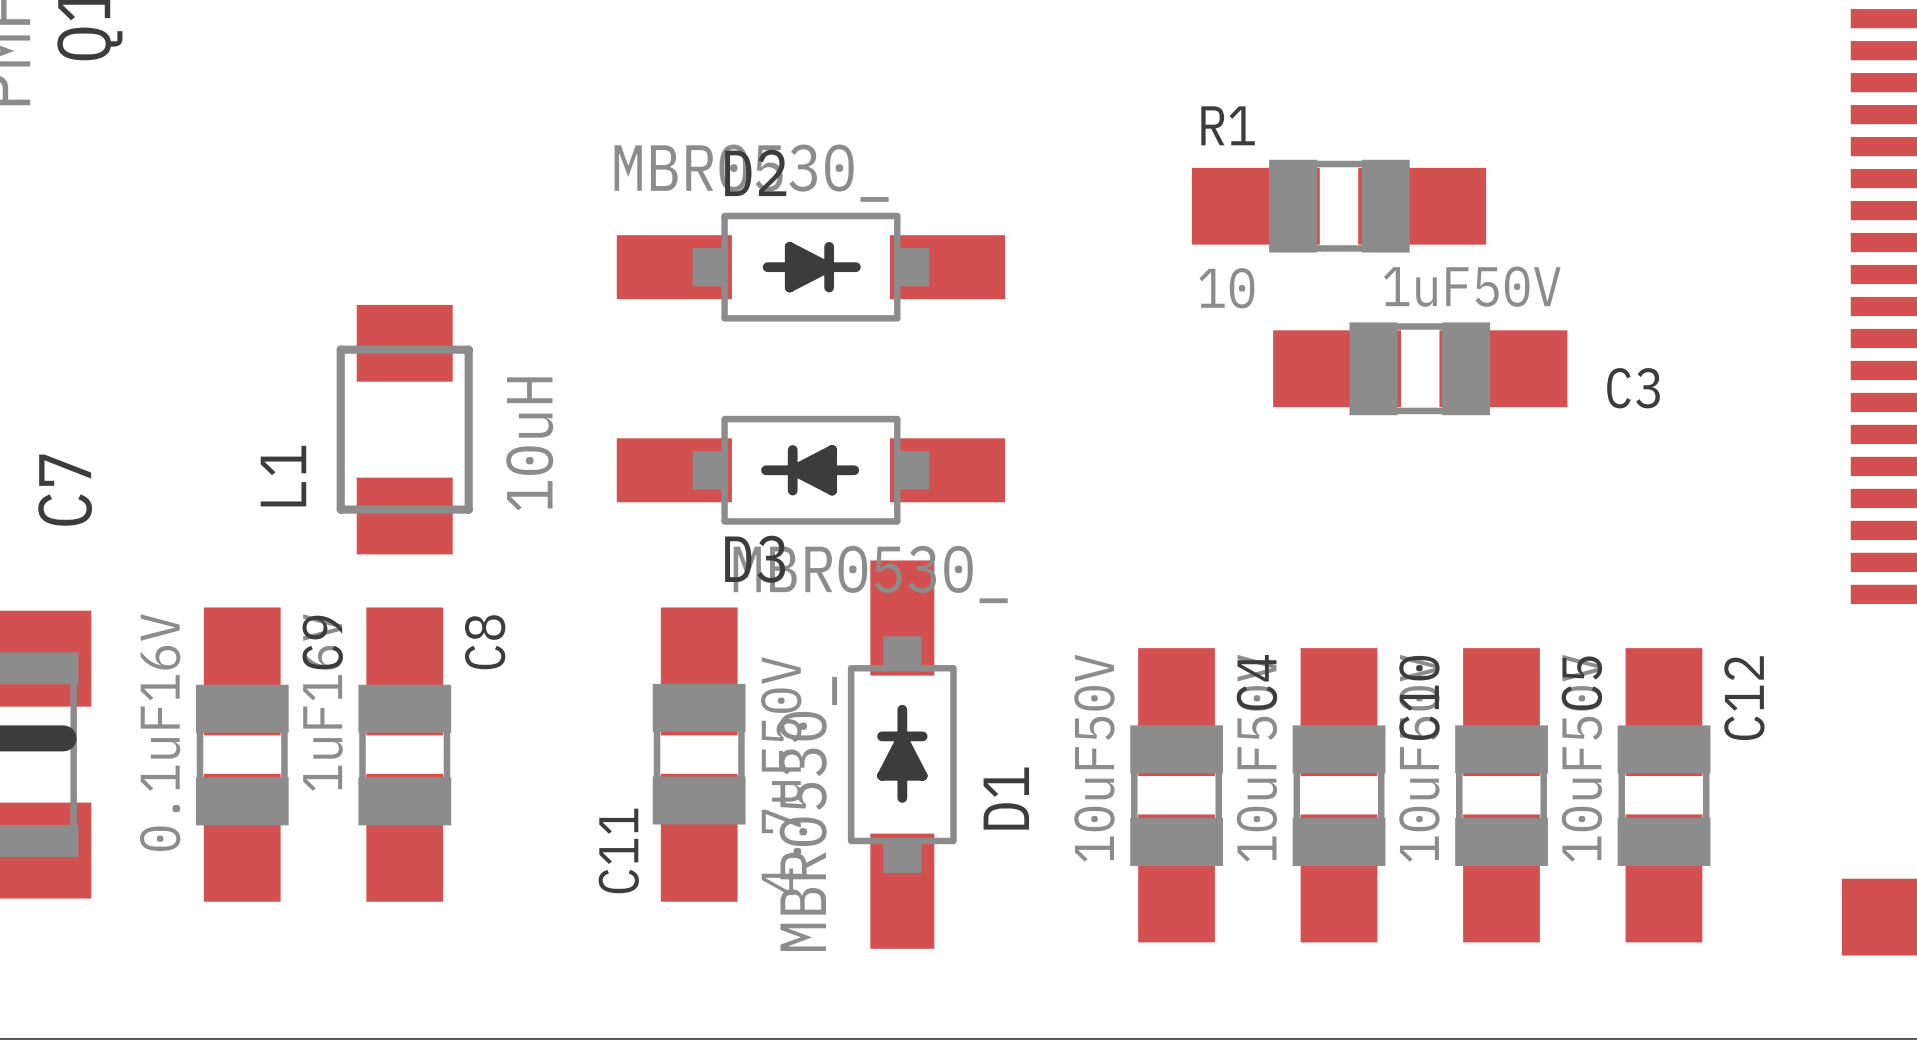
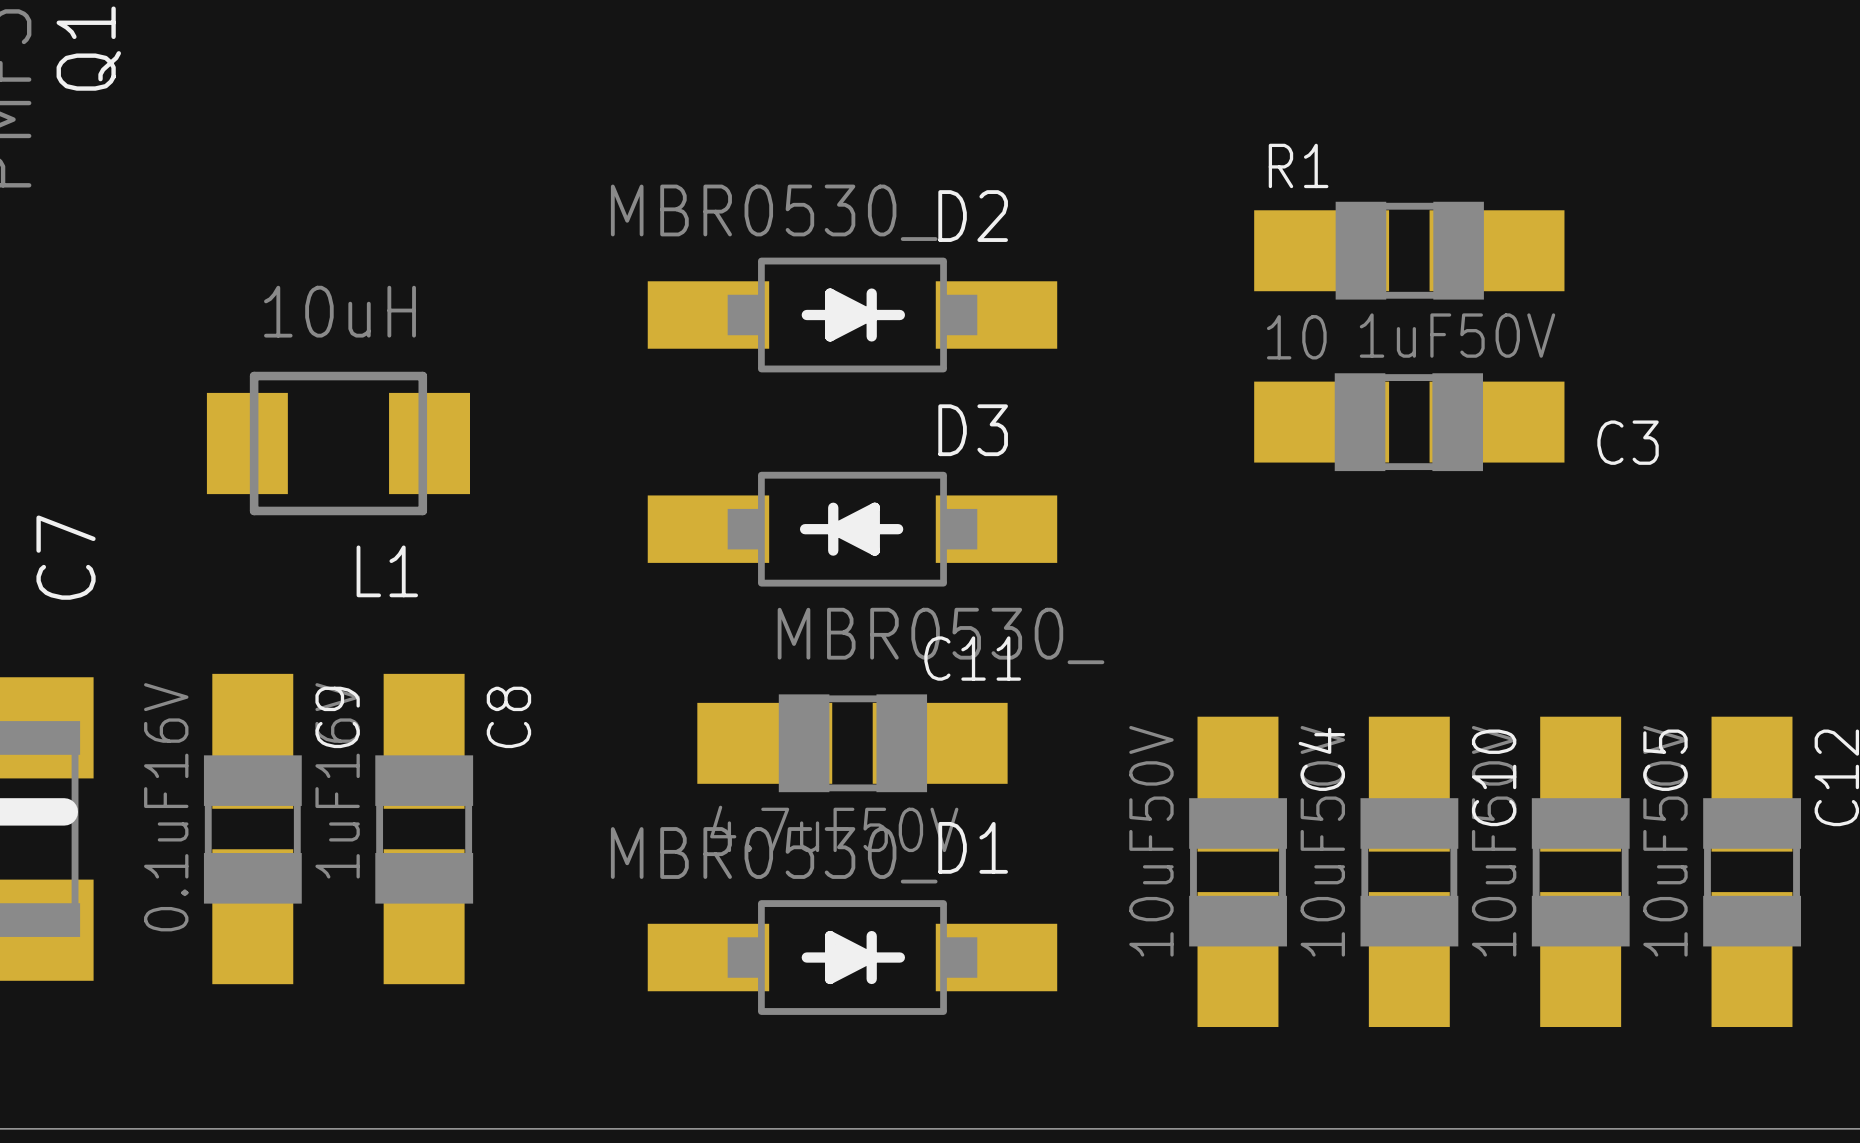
D2 name position: D2 (755, 172) -> D2 (973, 216)
C3 position: (1420, 368) -> (1409, 422)
L1 rotation: 0° (404, 429) -> 90° clockwise (338, 443)
L1 value position: 10uH (529, 443) -> 10uH (340, 311)
L1 name position: L1 (283, 476) -> L1 (387, 571)
D3 name position: D3 (755, 559) -> D3 (973, 430)
C11 rotation: 0° (699, 754) -> 90° clockwise (852, 743)
D1 rotation: 0° (902, 754) -> 90° clockwise (852, 957)
D1 name position: D1 (1006, 798) -> D1 (973, 847)
C11 name position: C11 (618, 850) -> C11 (972, 658)

